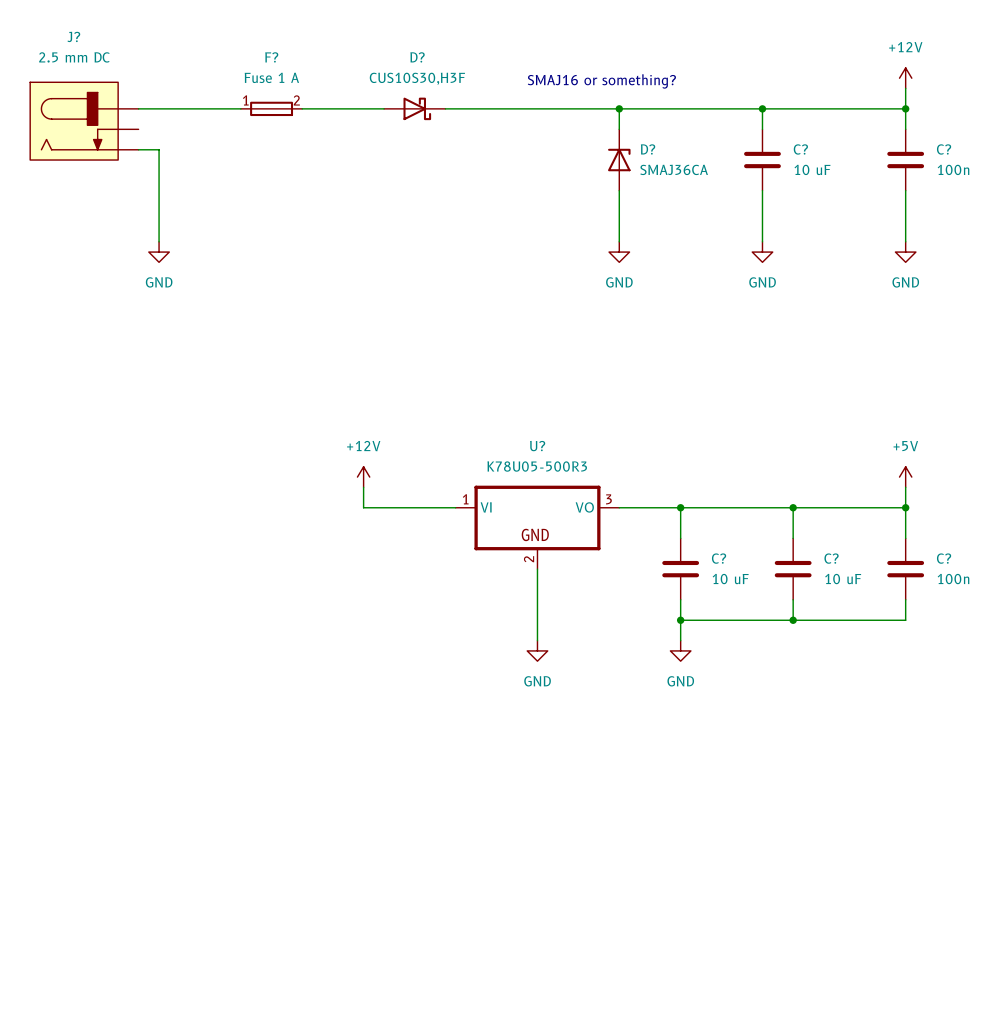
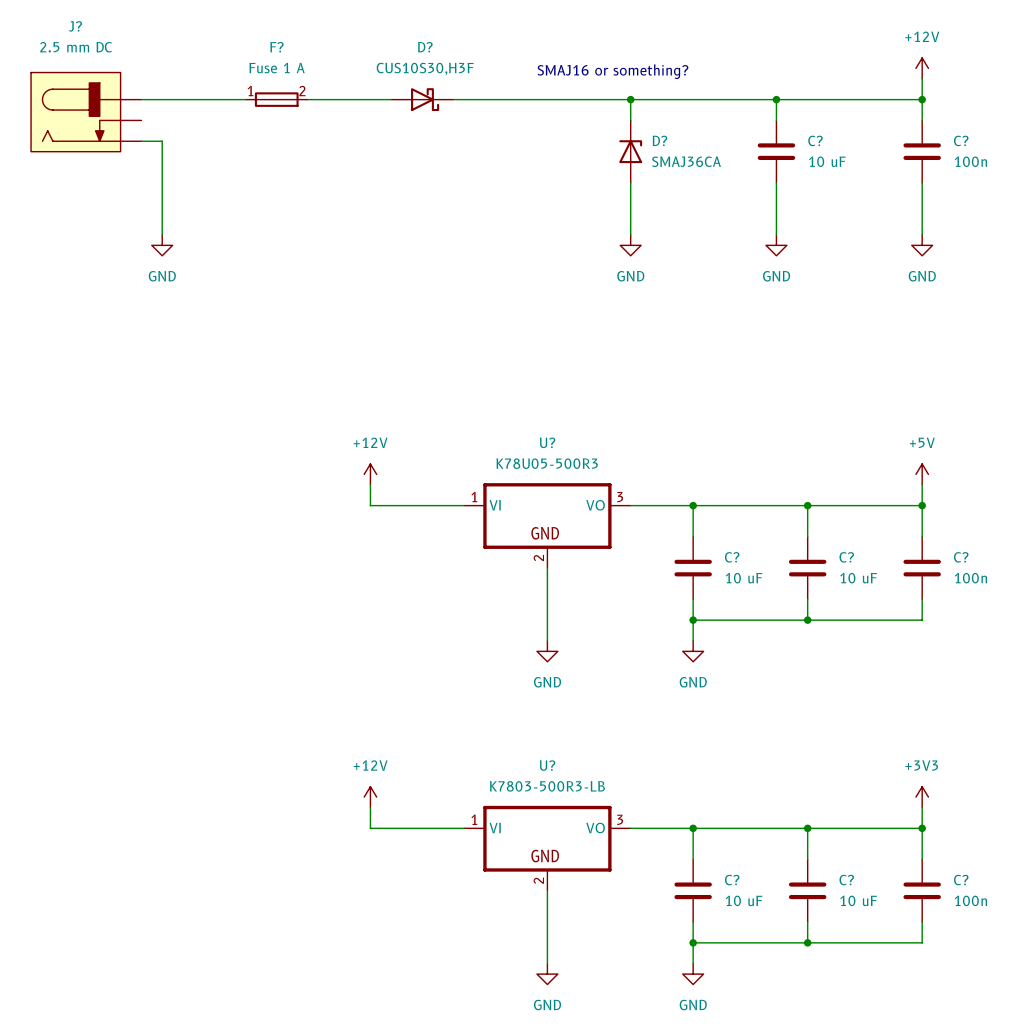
power symbol: none -> +12V (370, 797)
power symbol: none -> +3V3 (922, 797)
wire: none -> (370, 807) (370, 828) (464, 828)
wire: none -> (922, 807) (922, 859)
wire: none -> (630, 828) (922, 828)
wire: none -> (693, 828) (693, 859)
junction: none -> (693, 828)
wire: none -> (807, 828) (807, 859)
junction: none -> (807, 828)
junction: none -> (922, 828)
U?: none -> (547, 848)
wire: none -> (547, 890) (547, 963)
C?: none -> (693, 890)
C?: none -> (807, 890)
C?: none -> (922, 890)
wire: none -> (693, 922) (693, 963)
wire: none -> (807, 922) (807, 942)
wire: none -> (922, 922) (922, 942) (693, 942)
junction: none -> (693, 942)
junction: none -> (807, 942)
power symbol: none -> GND (547, 974)
power symbol: none -> GND (693, 974)

